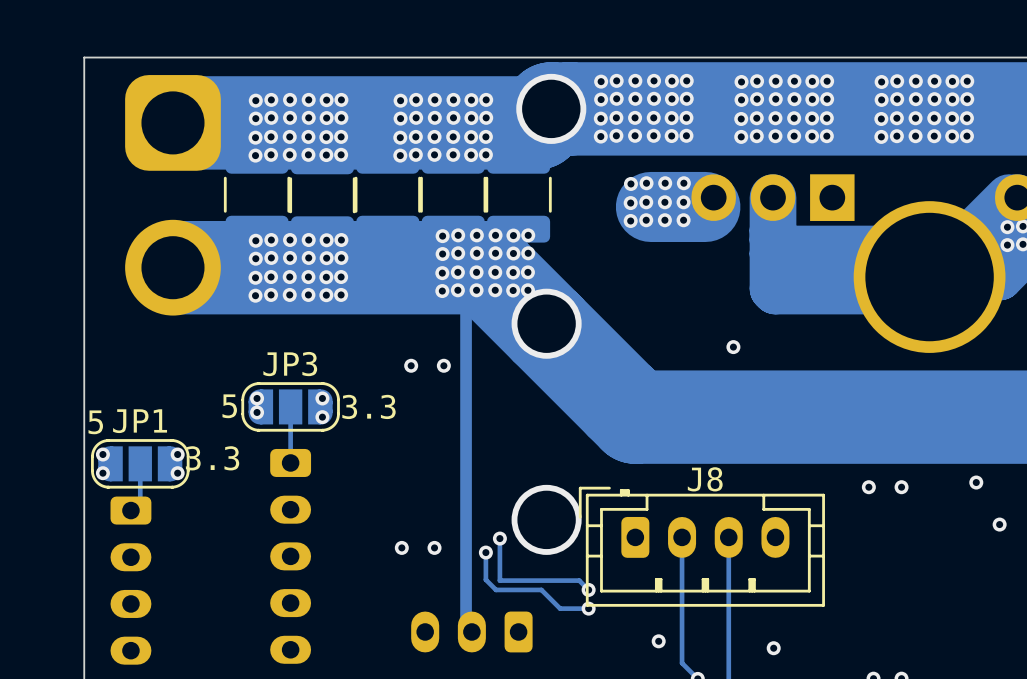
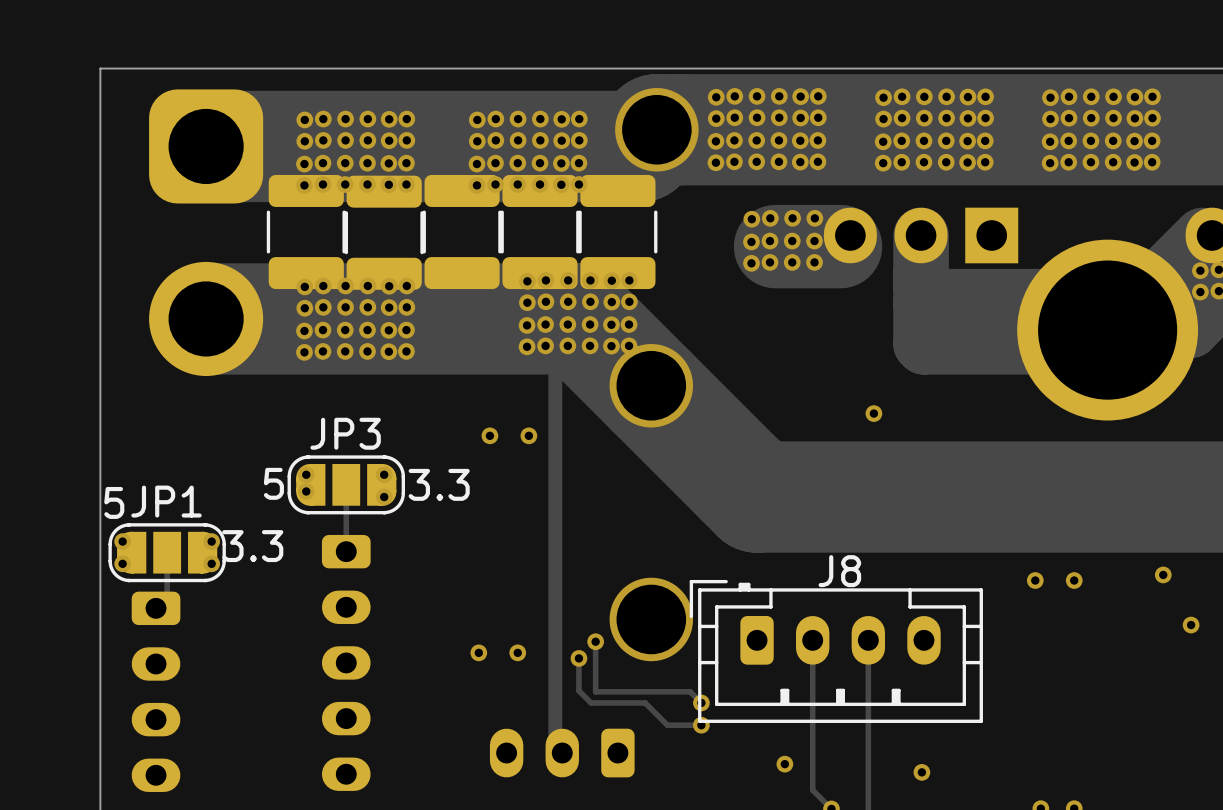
part footprint: [853, 201, 1006, 353] -> [1017, 239, 1199, 421]

